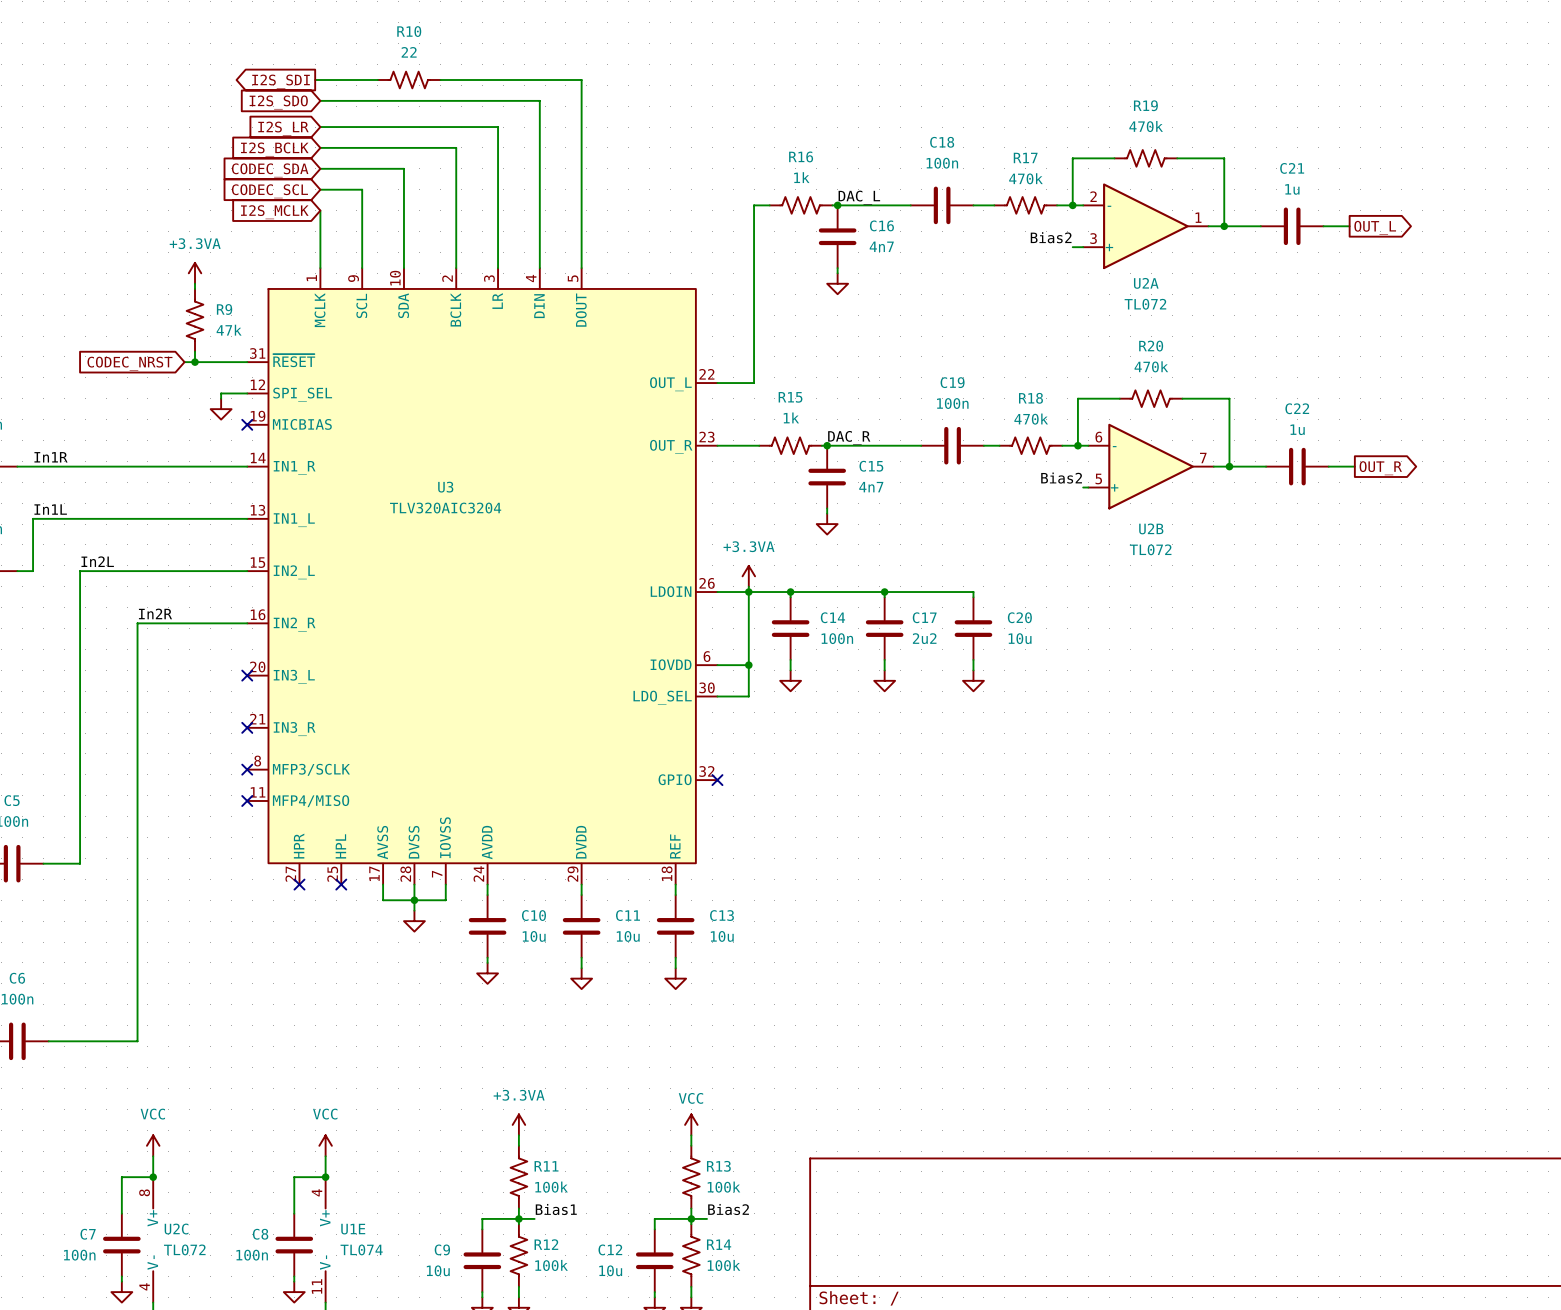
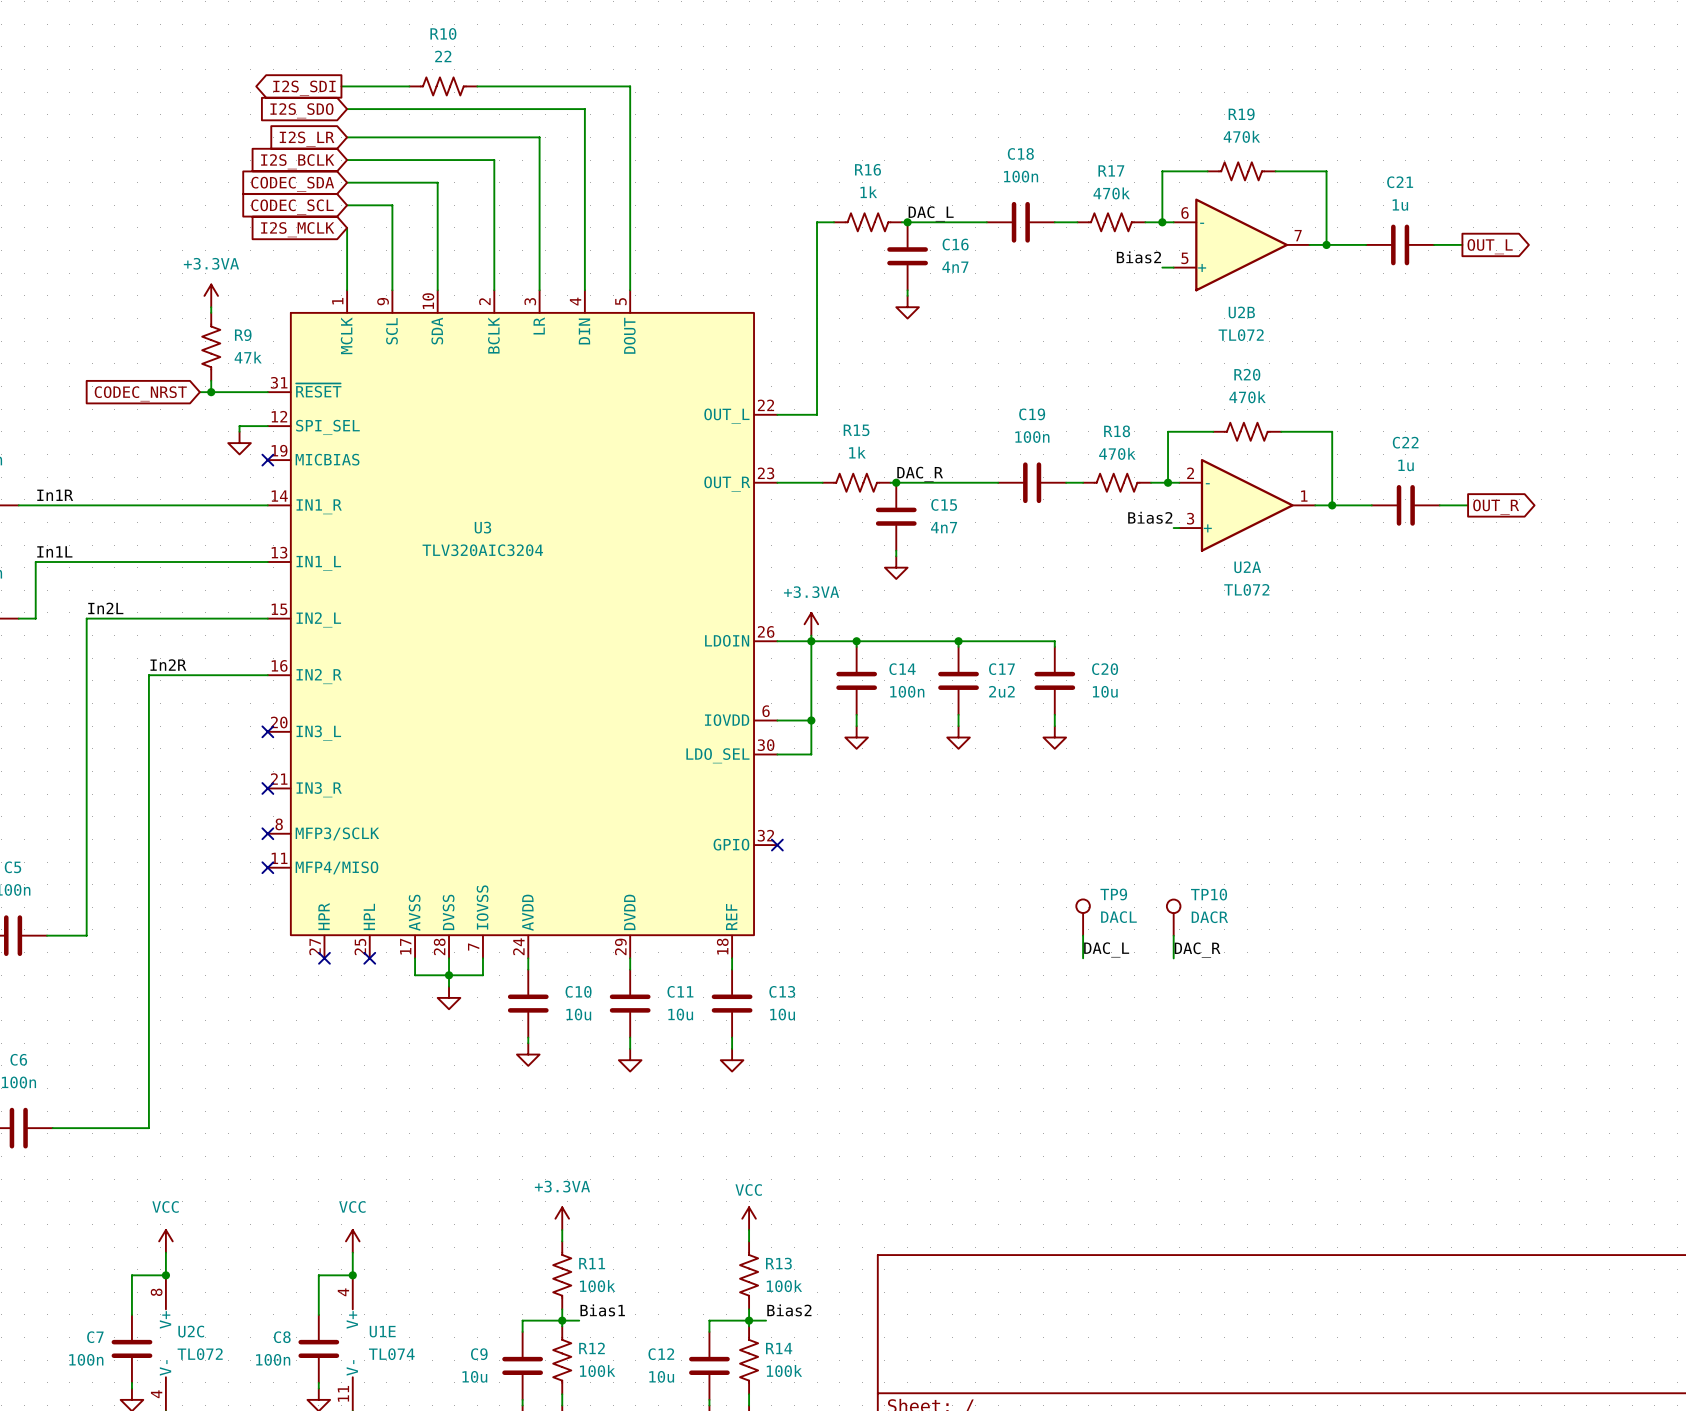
U2A position: (1145, 226) -> (1247, 505)
U2B position: (1151, 466) -> (1241, 244)
TP9: none -> DACL (1083, 917)
TP10: none -> DACR (1173, 917)
wire: none -> (1083, 935) (1083, 958)
wire: none -> (1173, 935) (1173, 958)
label: none -> DAC_L (1106, 949)
label: none -> DAC_R (1197, 950)

